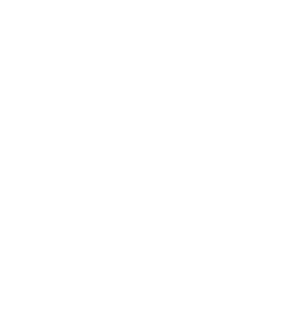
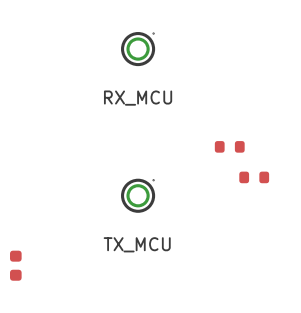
part: none -> RX_MCU (138, 49)
part: none -> (229, 146)
part: none -> (254, 177)
part: none -> TX_MCU (138, 195)
part: none -> (15, 265)

